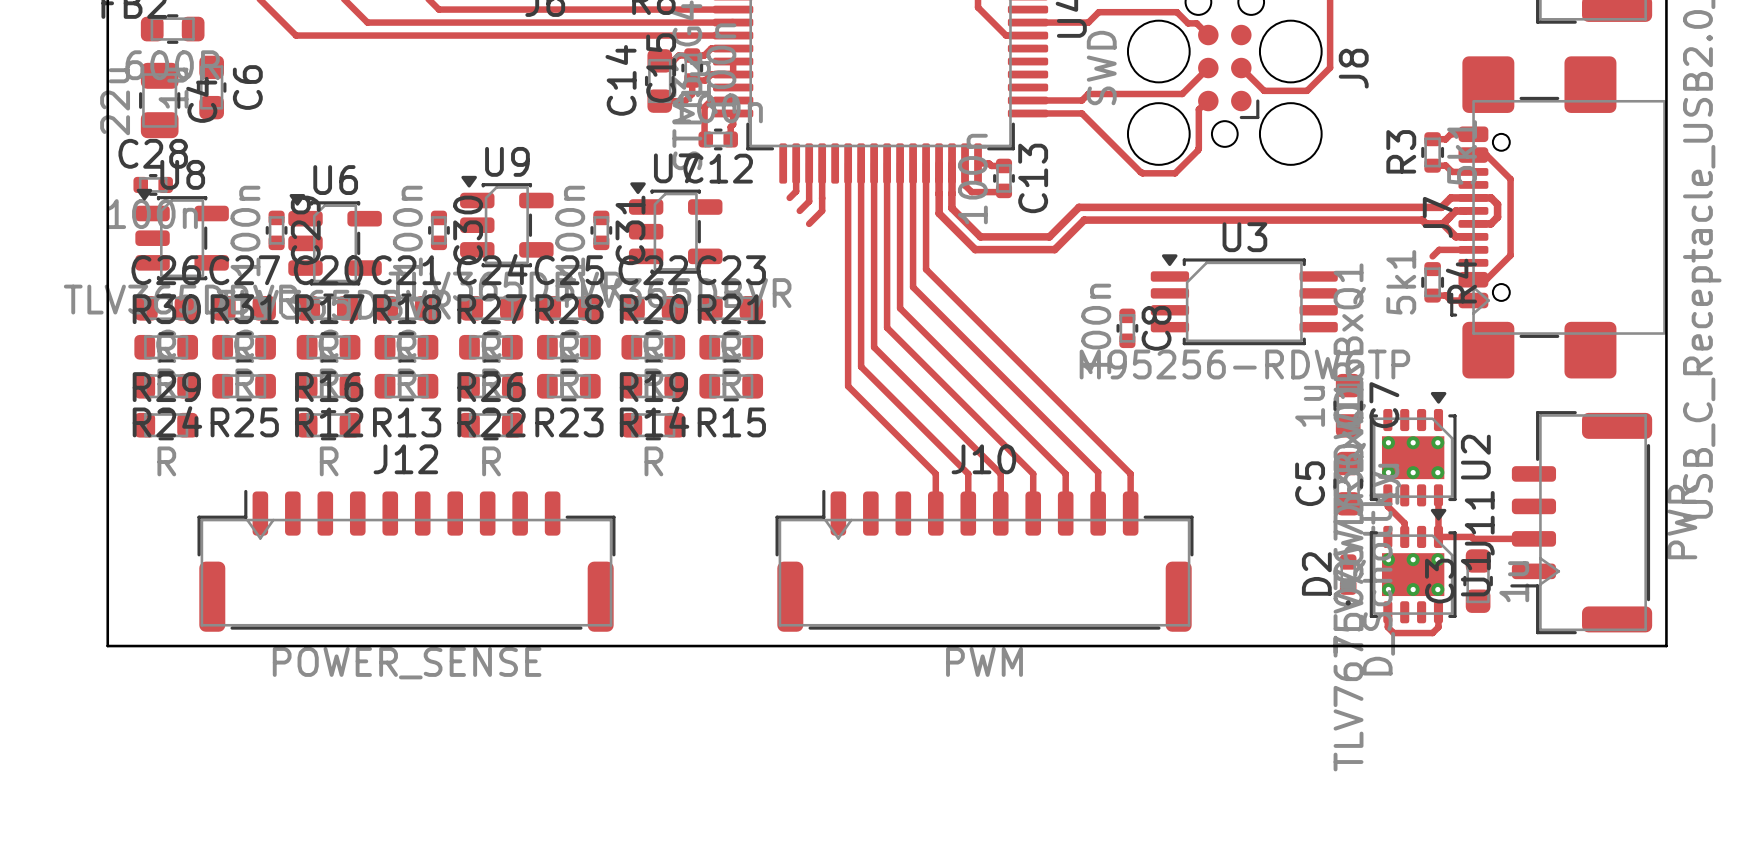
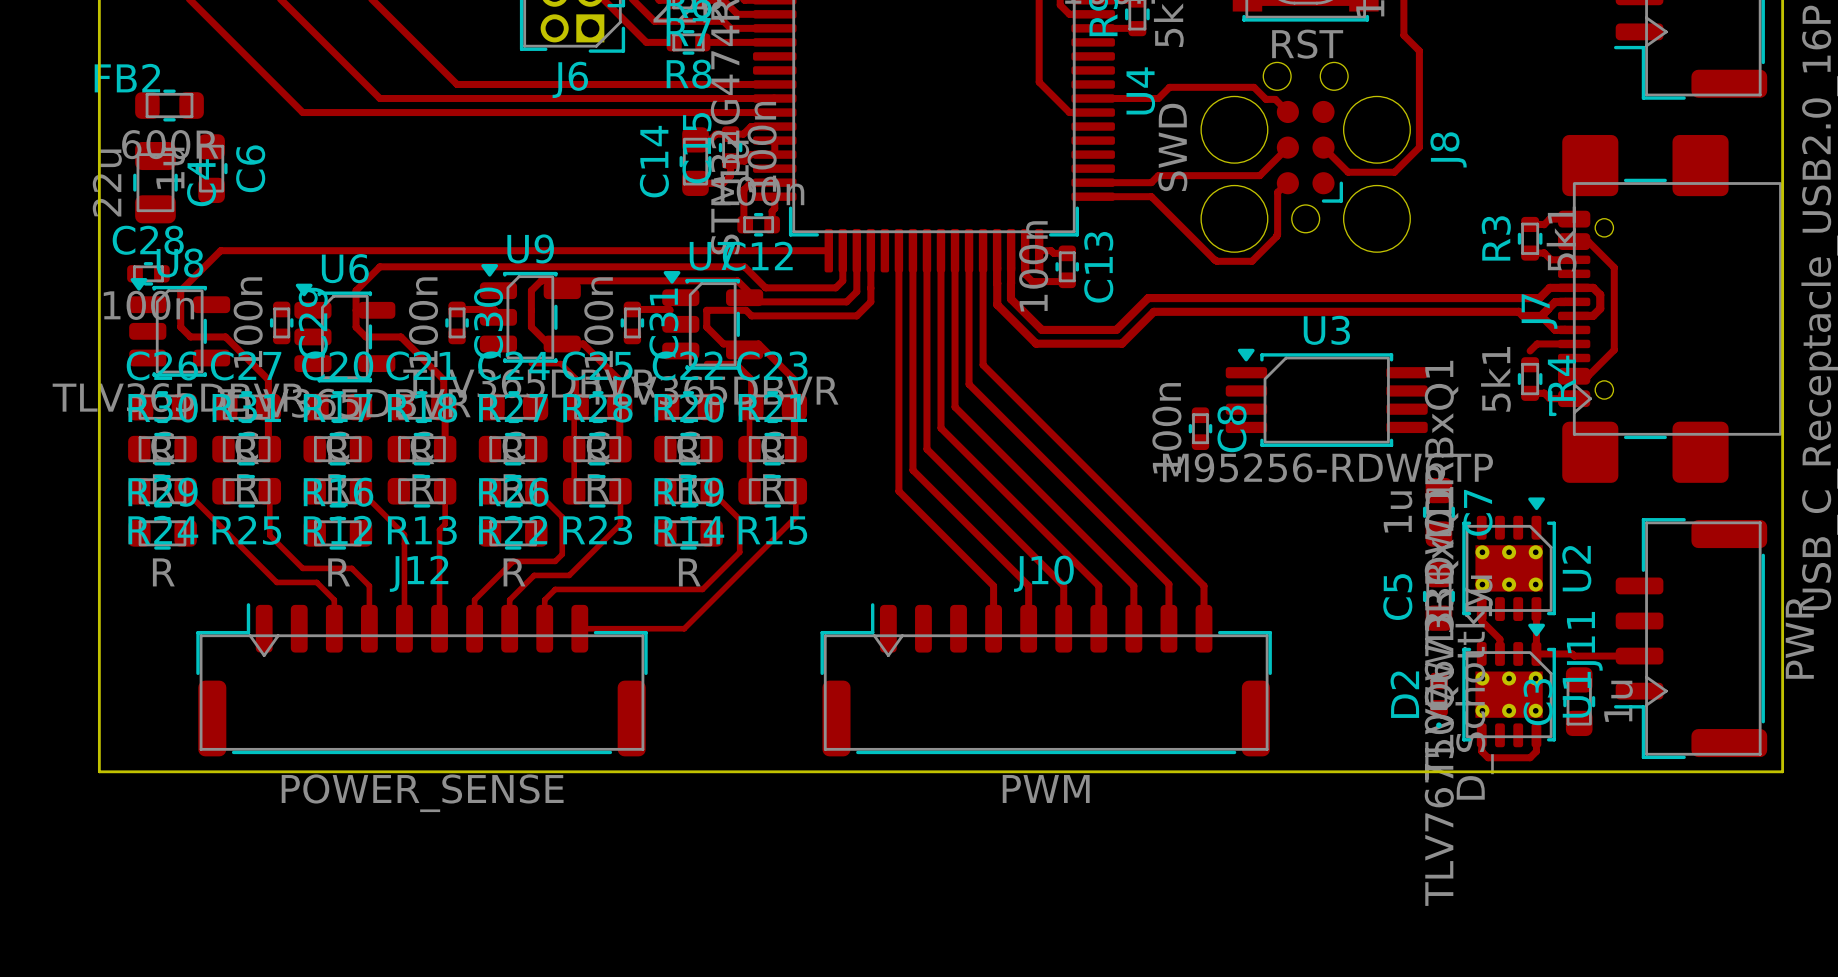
track: none -> (828, 250) (220, 250) (180, 290) (180, 327) (190, 336) (225, 336) (268, 379) (269, 449)
track: none -> (835, 287) (765, 287) (744, 266) (379, 266) (356, 290) (356, 327) (365, 336) (400, 336) (443, 379) (445, 449)
track: none -> (846, 301) (758, 301) (737, 280) (541, 280) (531, 290) (531, 327) (548, 343) (583, 343) (619, 380) (620, 449)
track: none -> (457, 309) (494, 310)
track: none -> (632, 309) (670, 310)
track: none -> (856, 315) (751, 315) (746, 310) (706, 310) (706, 327) (723, 343) (758, 343) (794, 379) (795, 449)
track: none -> (531, 363) (560, 363) (576, 379) (576, 407) (574, 409) (574, 491)
track: none -> (706, 363) (736, 363) (750, 378) (749, 491)
track: none -> (185, 491) (276, 582) (316, 582) (334, 599) (334, 628)
track: none -> (269, 491) (269, 535) (302, 568) (351, 568) (369, 585) (369, 628)
track: none -> (360, 491) (404, 534) (404, 628)
track: none -> (445, 491) (445, 524) (439, 529) (439, 628)
track: none -> (536, 491) (562, 517) (562, 554) (555, 561) (513, 561) (474, 599) (474, 628)
track: none -> (620, 491) (620, 524) (569, 575) (534, 575) (509, 599) (509, 628)
track: none -> (711, 491) (739, 519) (739, 552) (702, 589) (555, 589) (544, 599) (544, 628)
track: none -> (795, 491) (795, 517) (684, 628) (579, 628)

